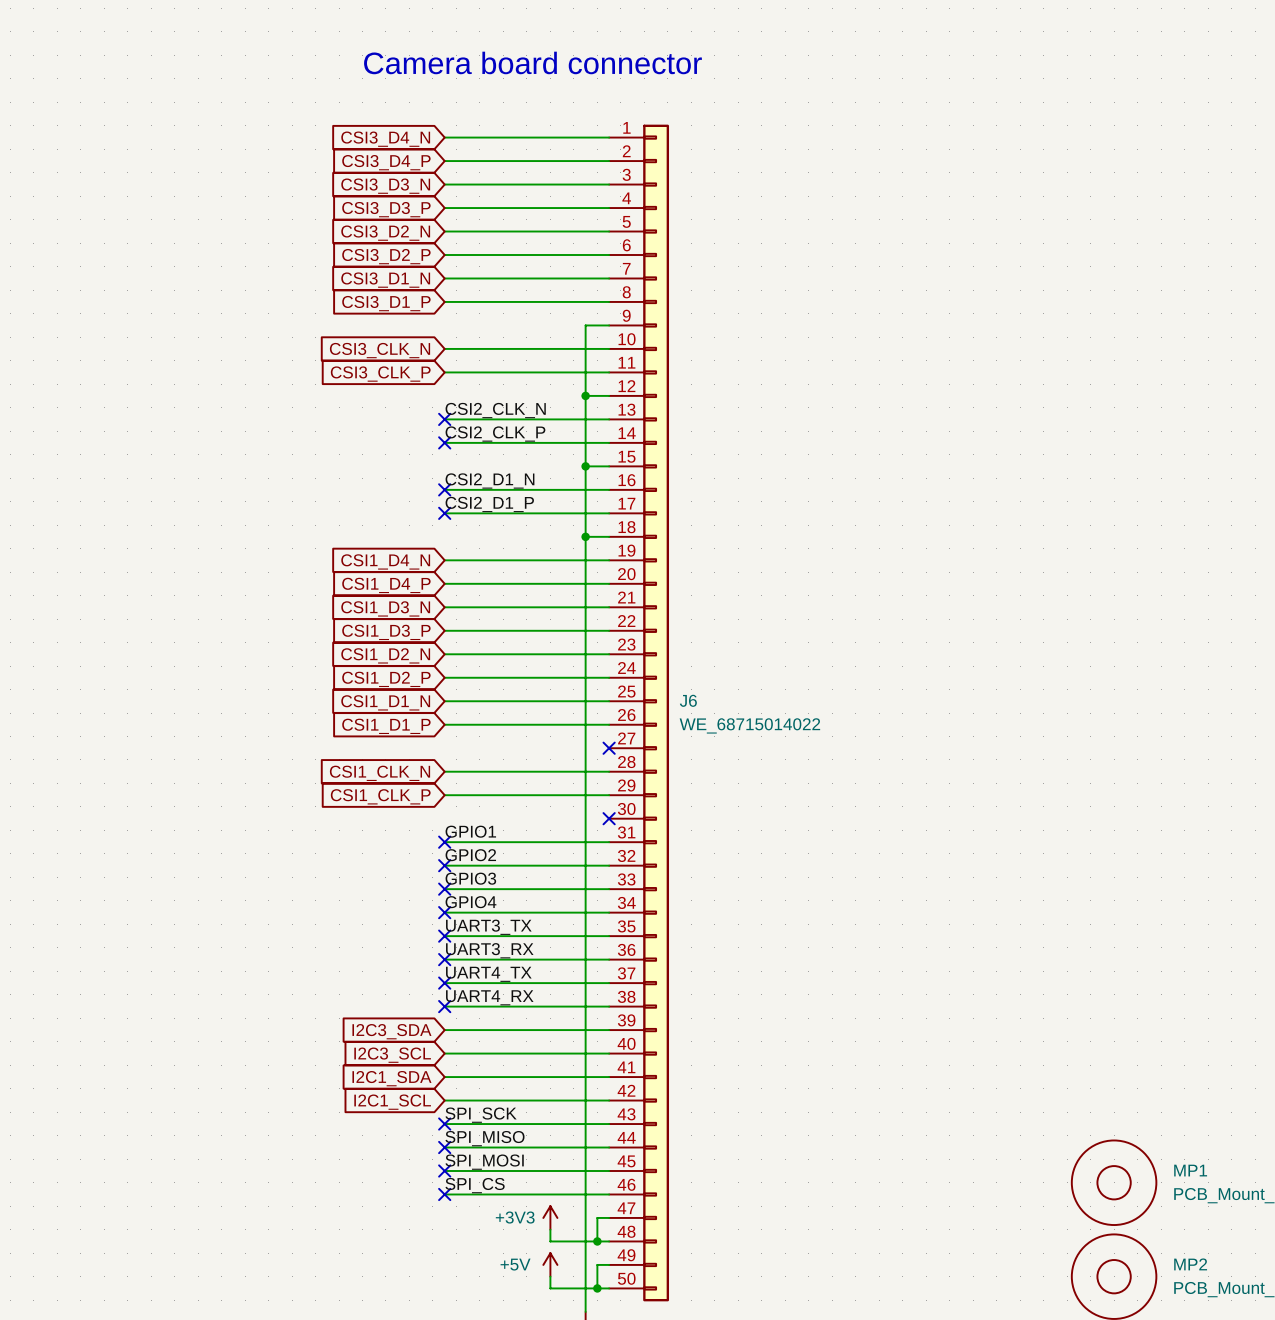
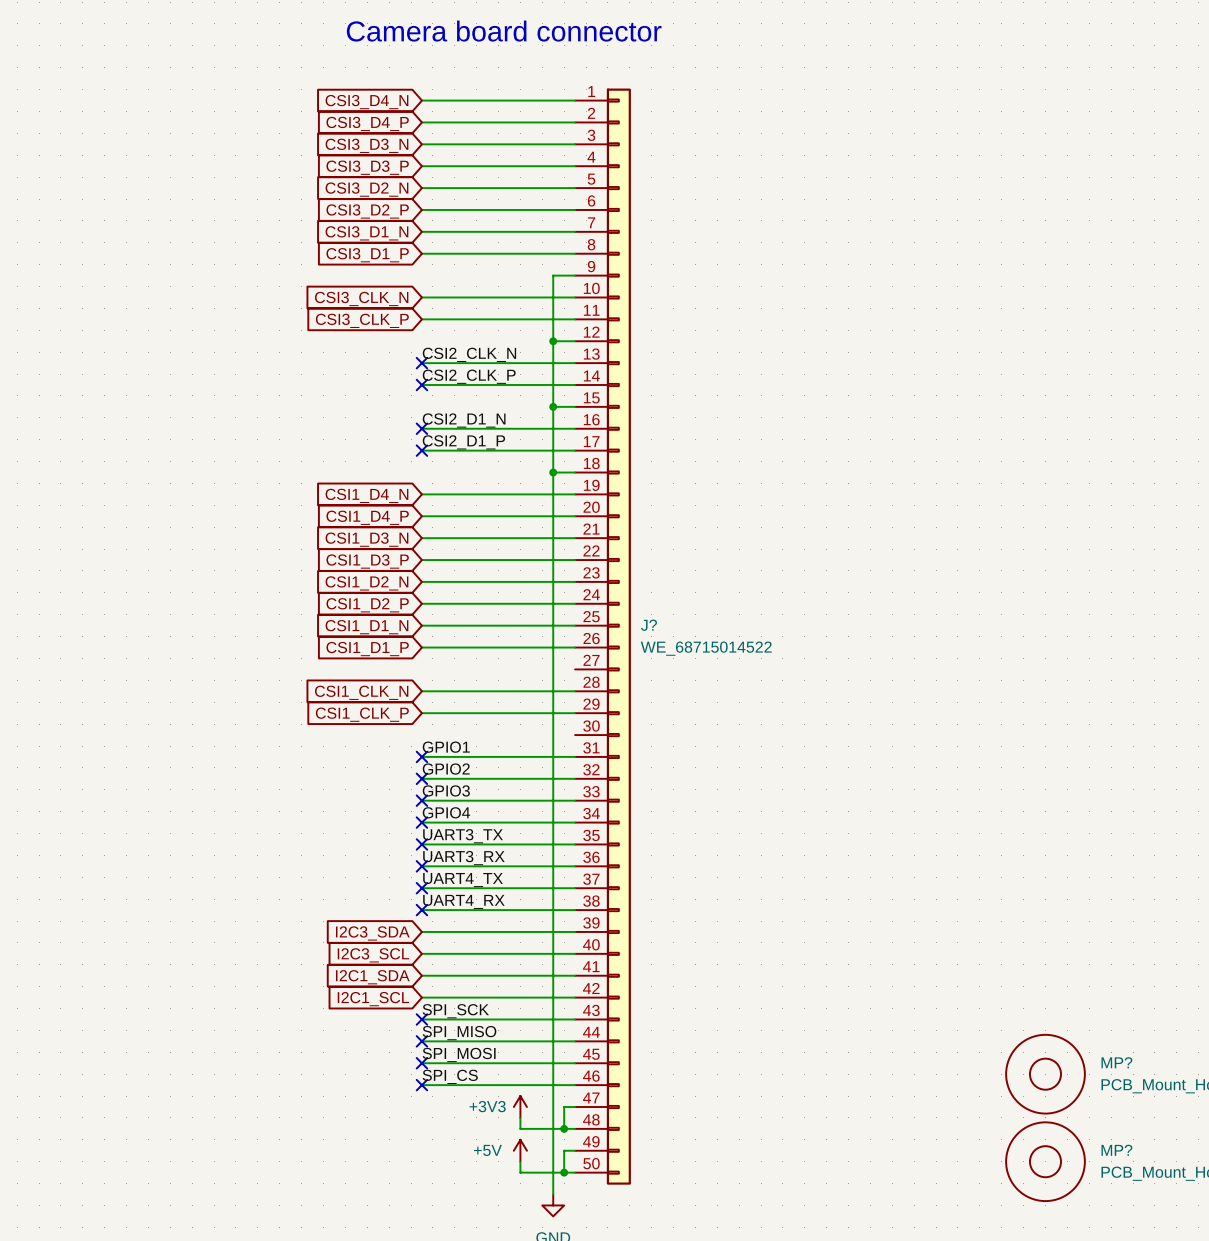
J6 name: J6 (688, 700) -> J? (648, 625)
J6 value: WE_68715014022 (749, 725) -> WE_68715014522 (706, 648)
no-connect mark: (609, 748) -> none
no-connect mark: (609, 818) -> none
MP1 name: MP1 (1190, 1170) -> MP? (1116, 1062)
MP2 name: MP2 (1190, 1264) -> MP? (1116, 1150)

